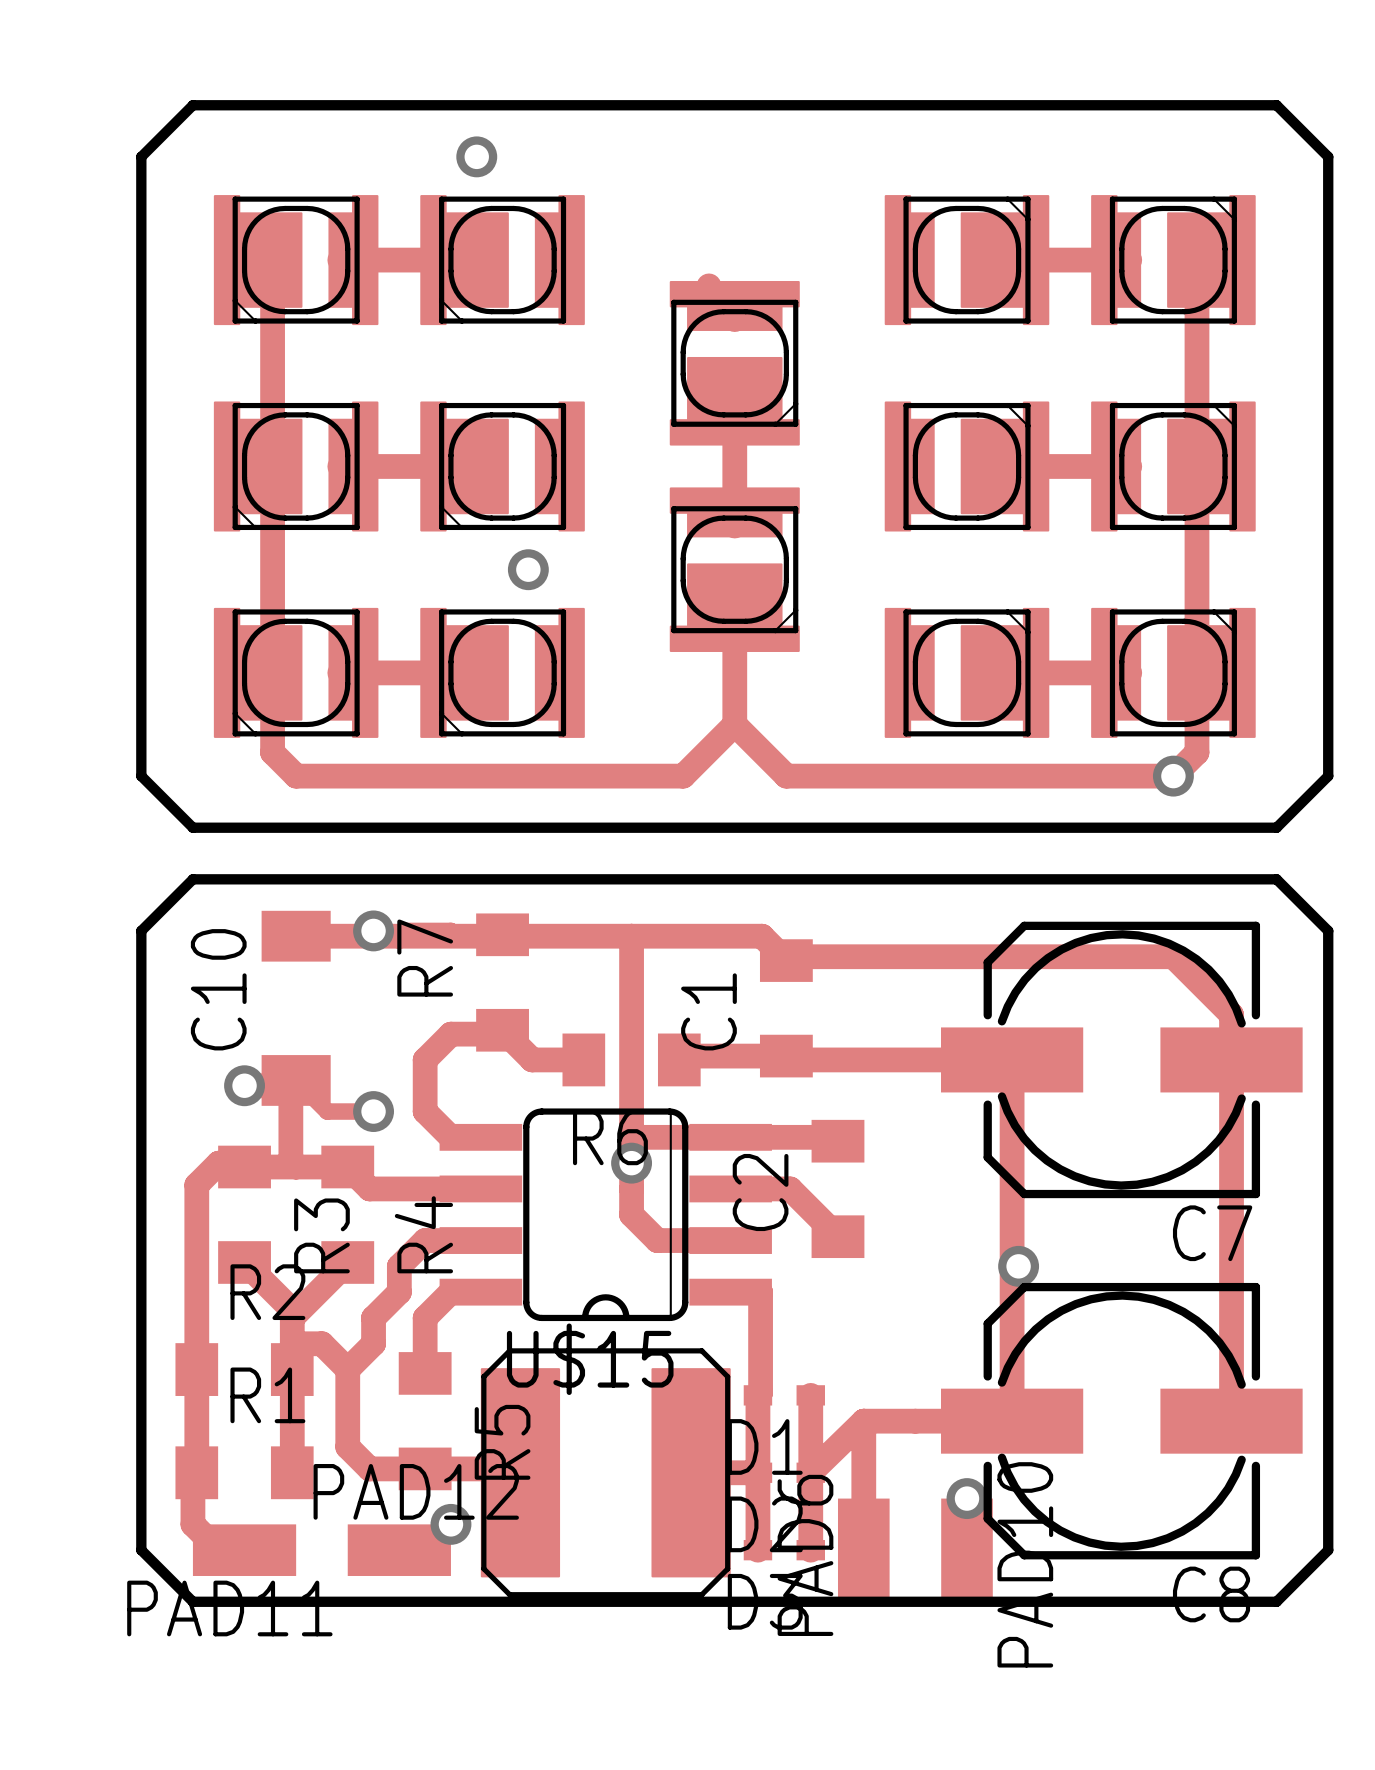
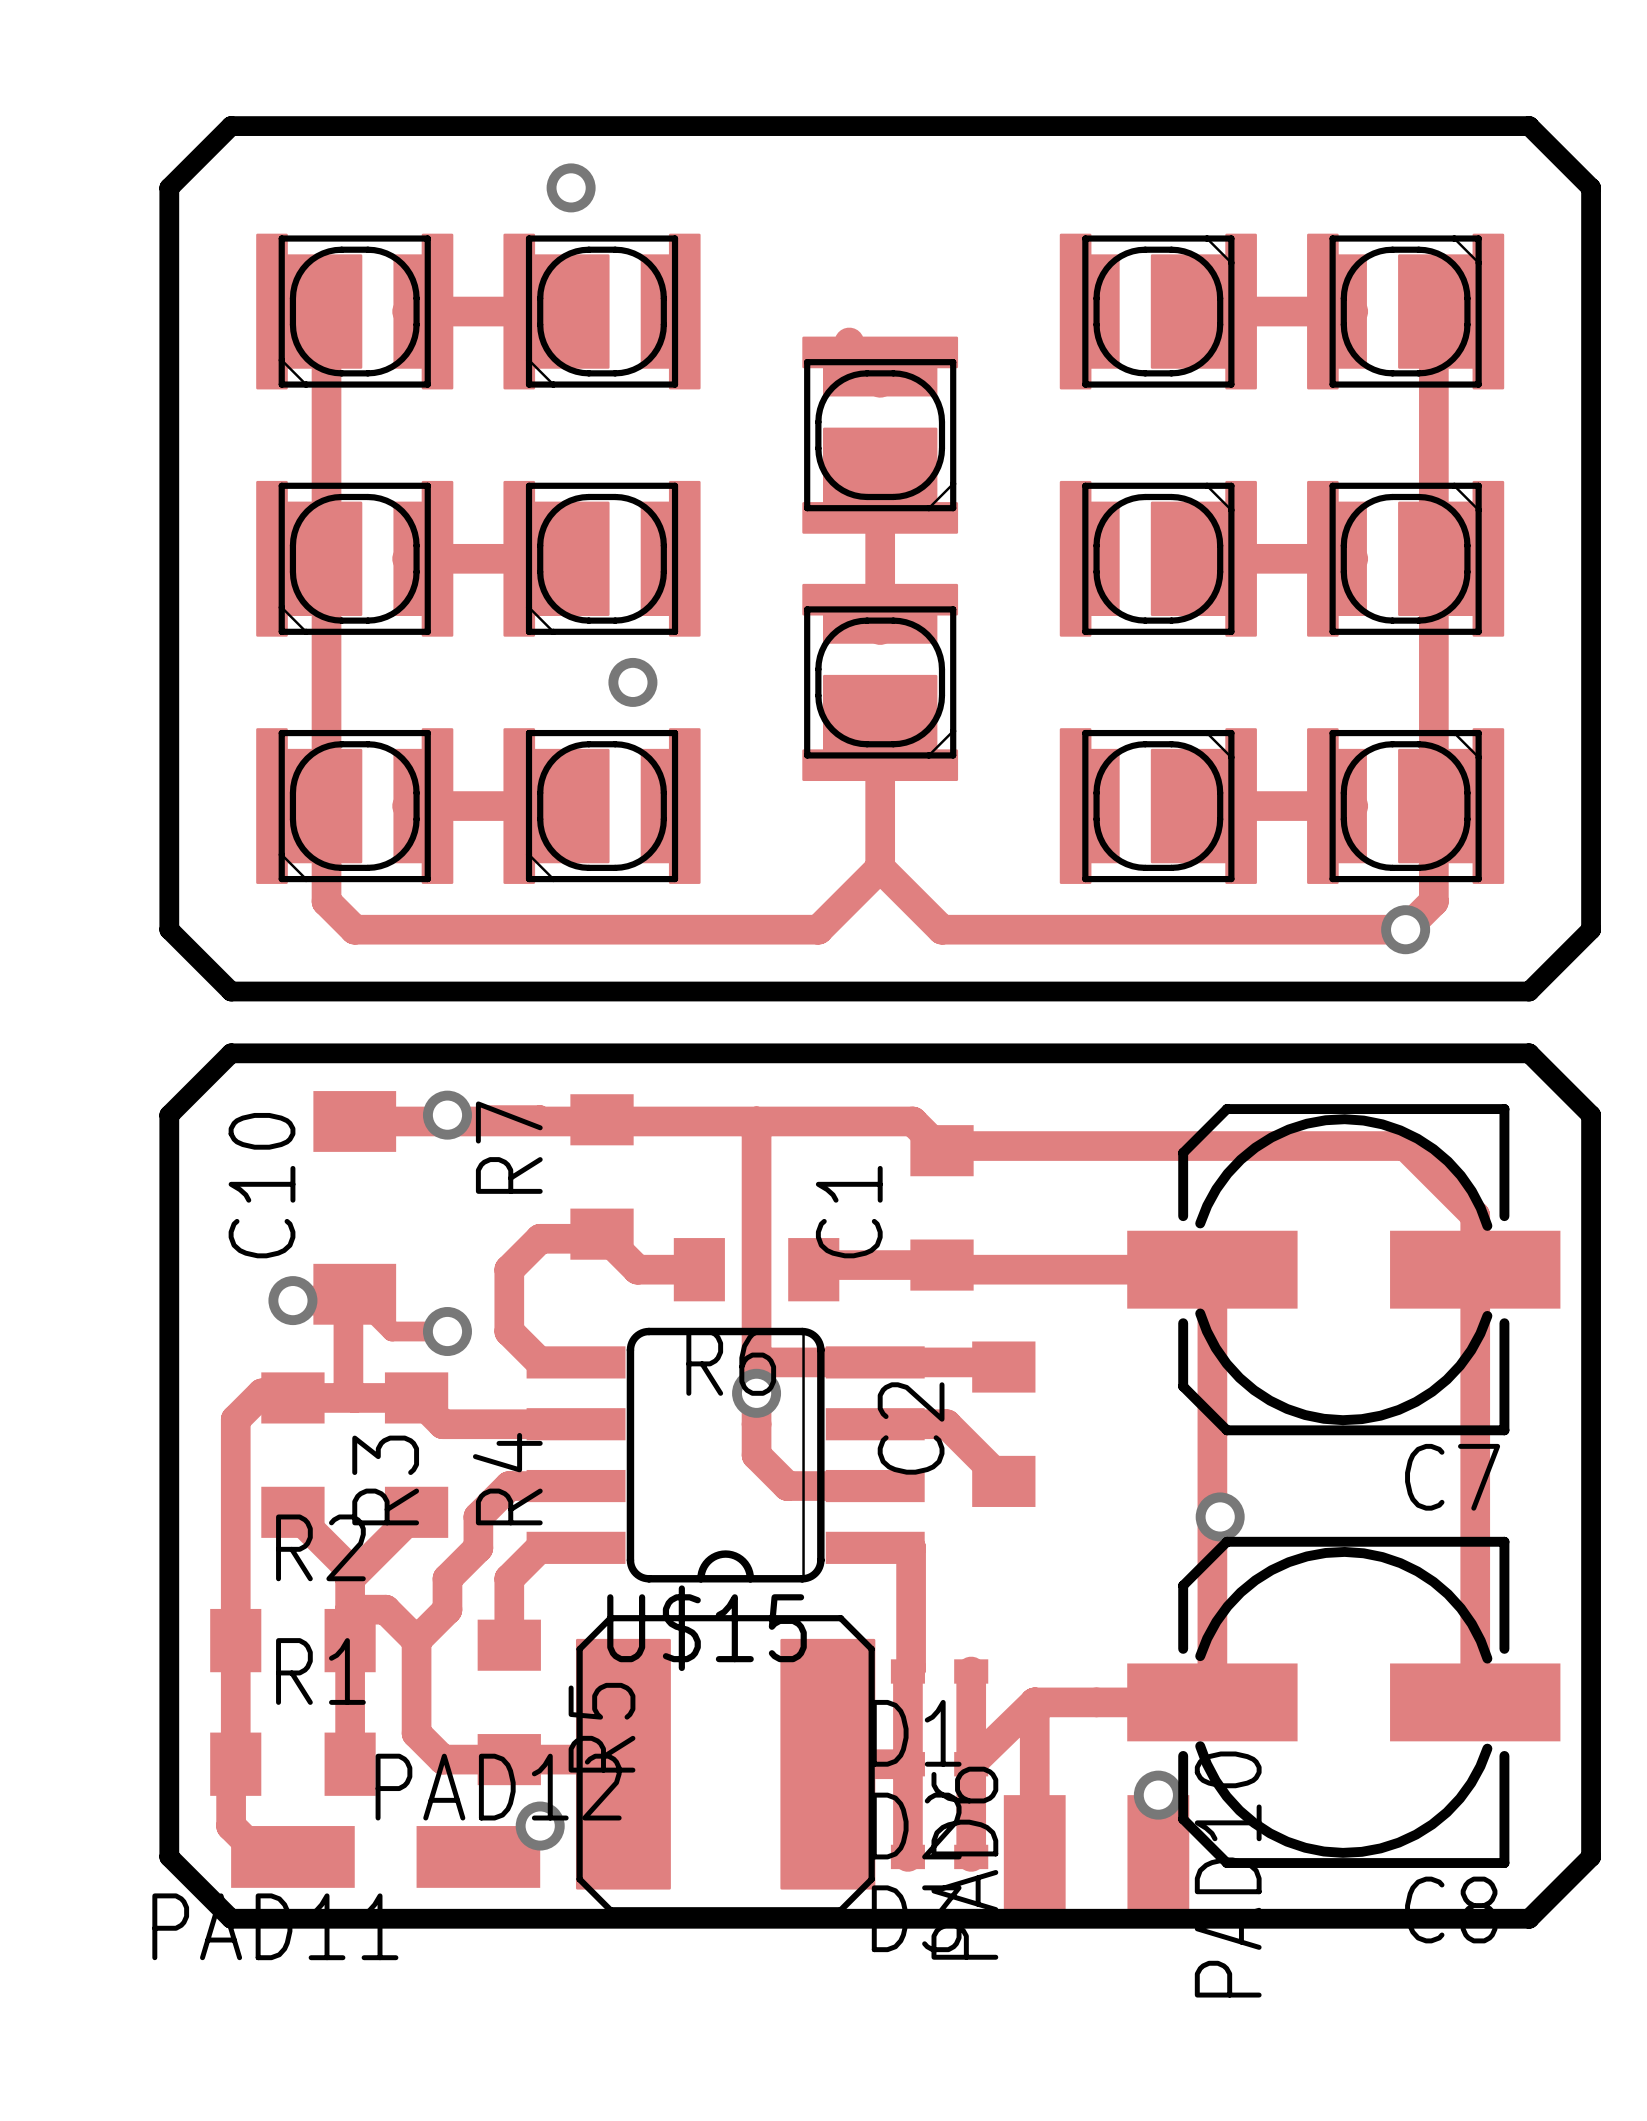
board edge width: thin (192, 105) (1276, 105) (1328, 156) (1328, 776) (1276, 827) (192, 827) (141, 776) (141, 156) (192, 105) -> thick (231, 126) (1529, 126) (1591, 187) (1591, 929) (1529, 991) (231, 991) (169, 929) (169, 187) (231, 126)
board edge width: thin (192, 879) (141, 930) (141, 1550) (192, 1601) (1276, 1601) (1328, 1550) (1328, 930) (1276, 879) (192, 879) -> thick (231, 1053) (169, 1115) (169, 1856) (231, 1918) (1529, 1918) (1591, 1856) (1591, 1115) (1529, 1053) (231, 1053)

